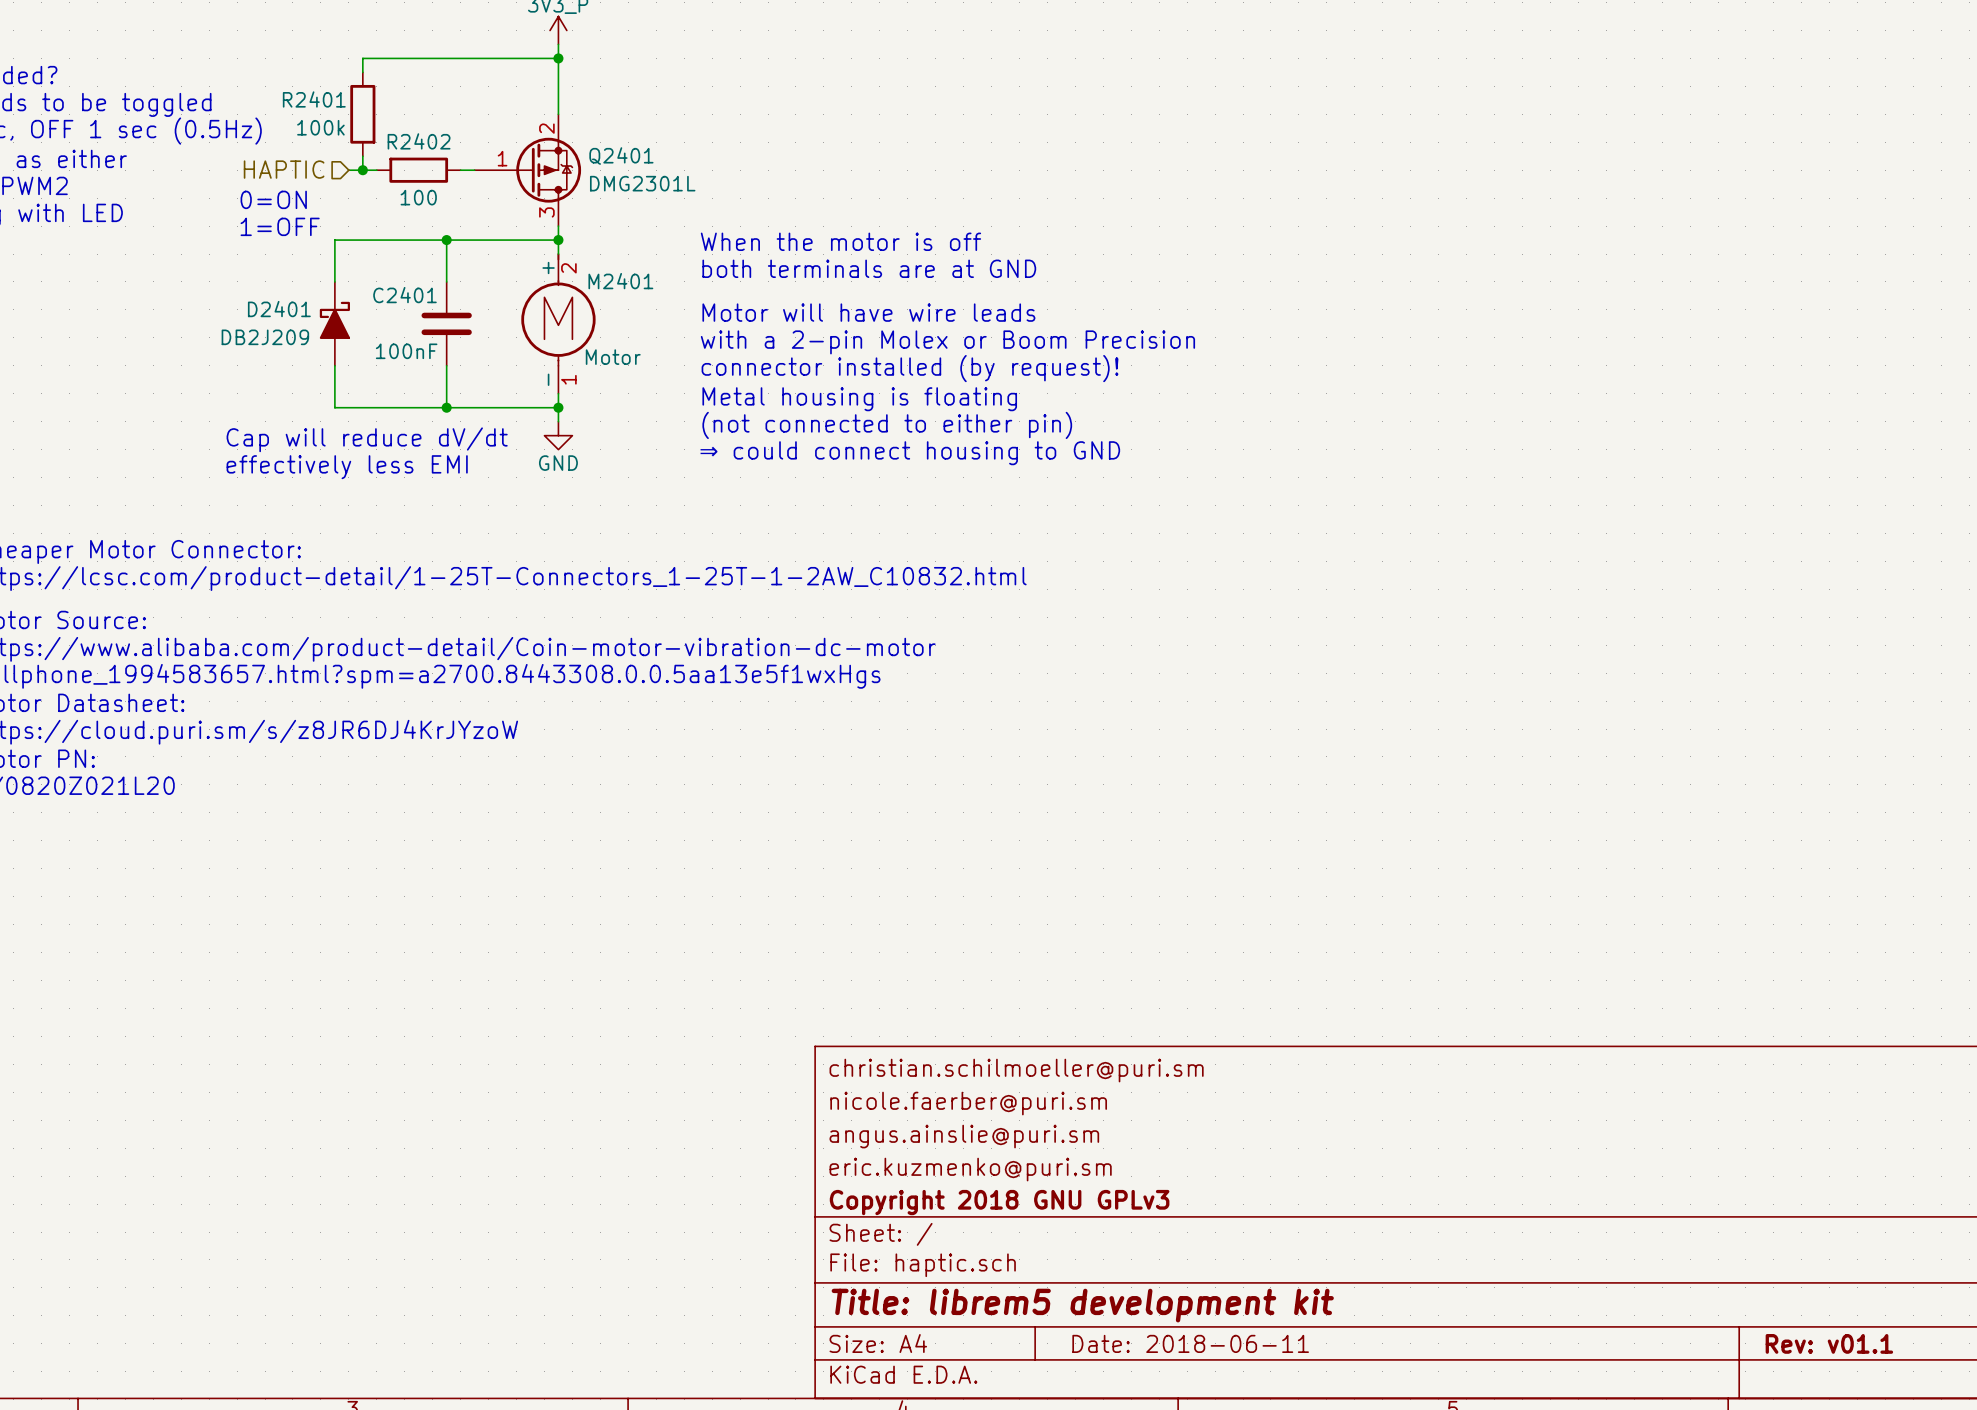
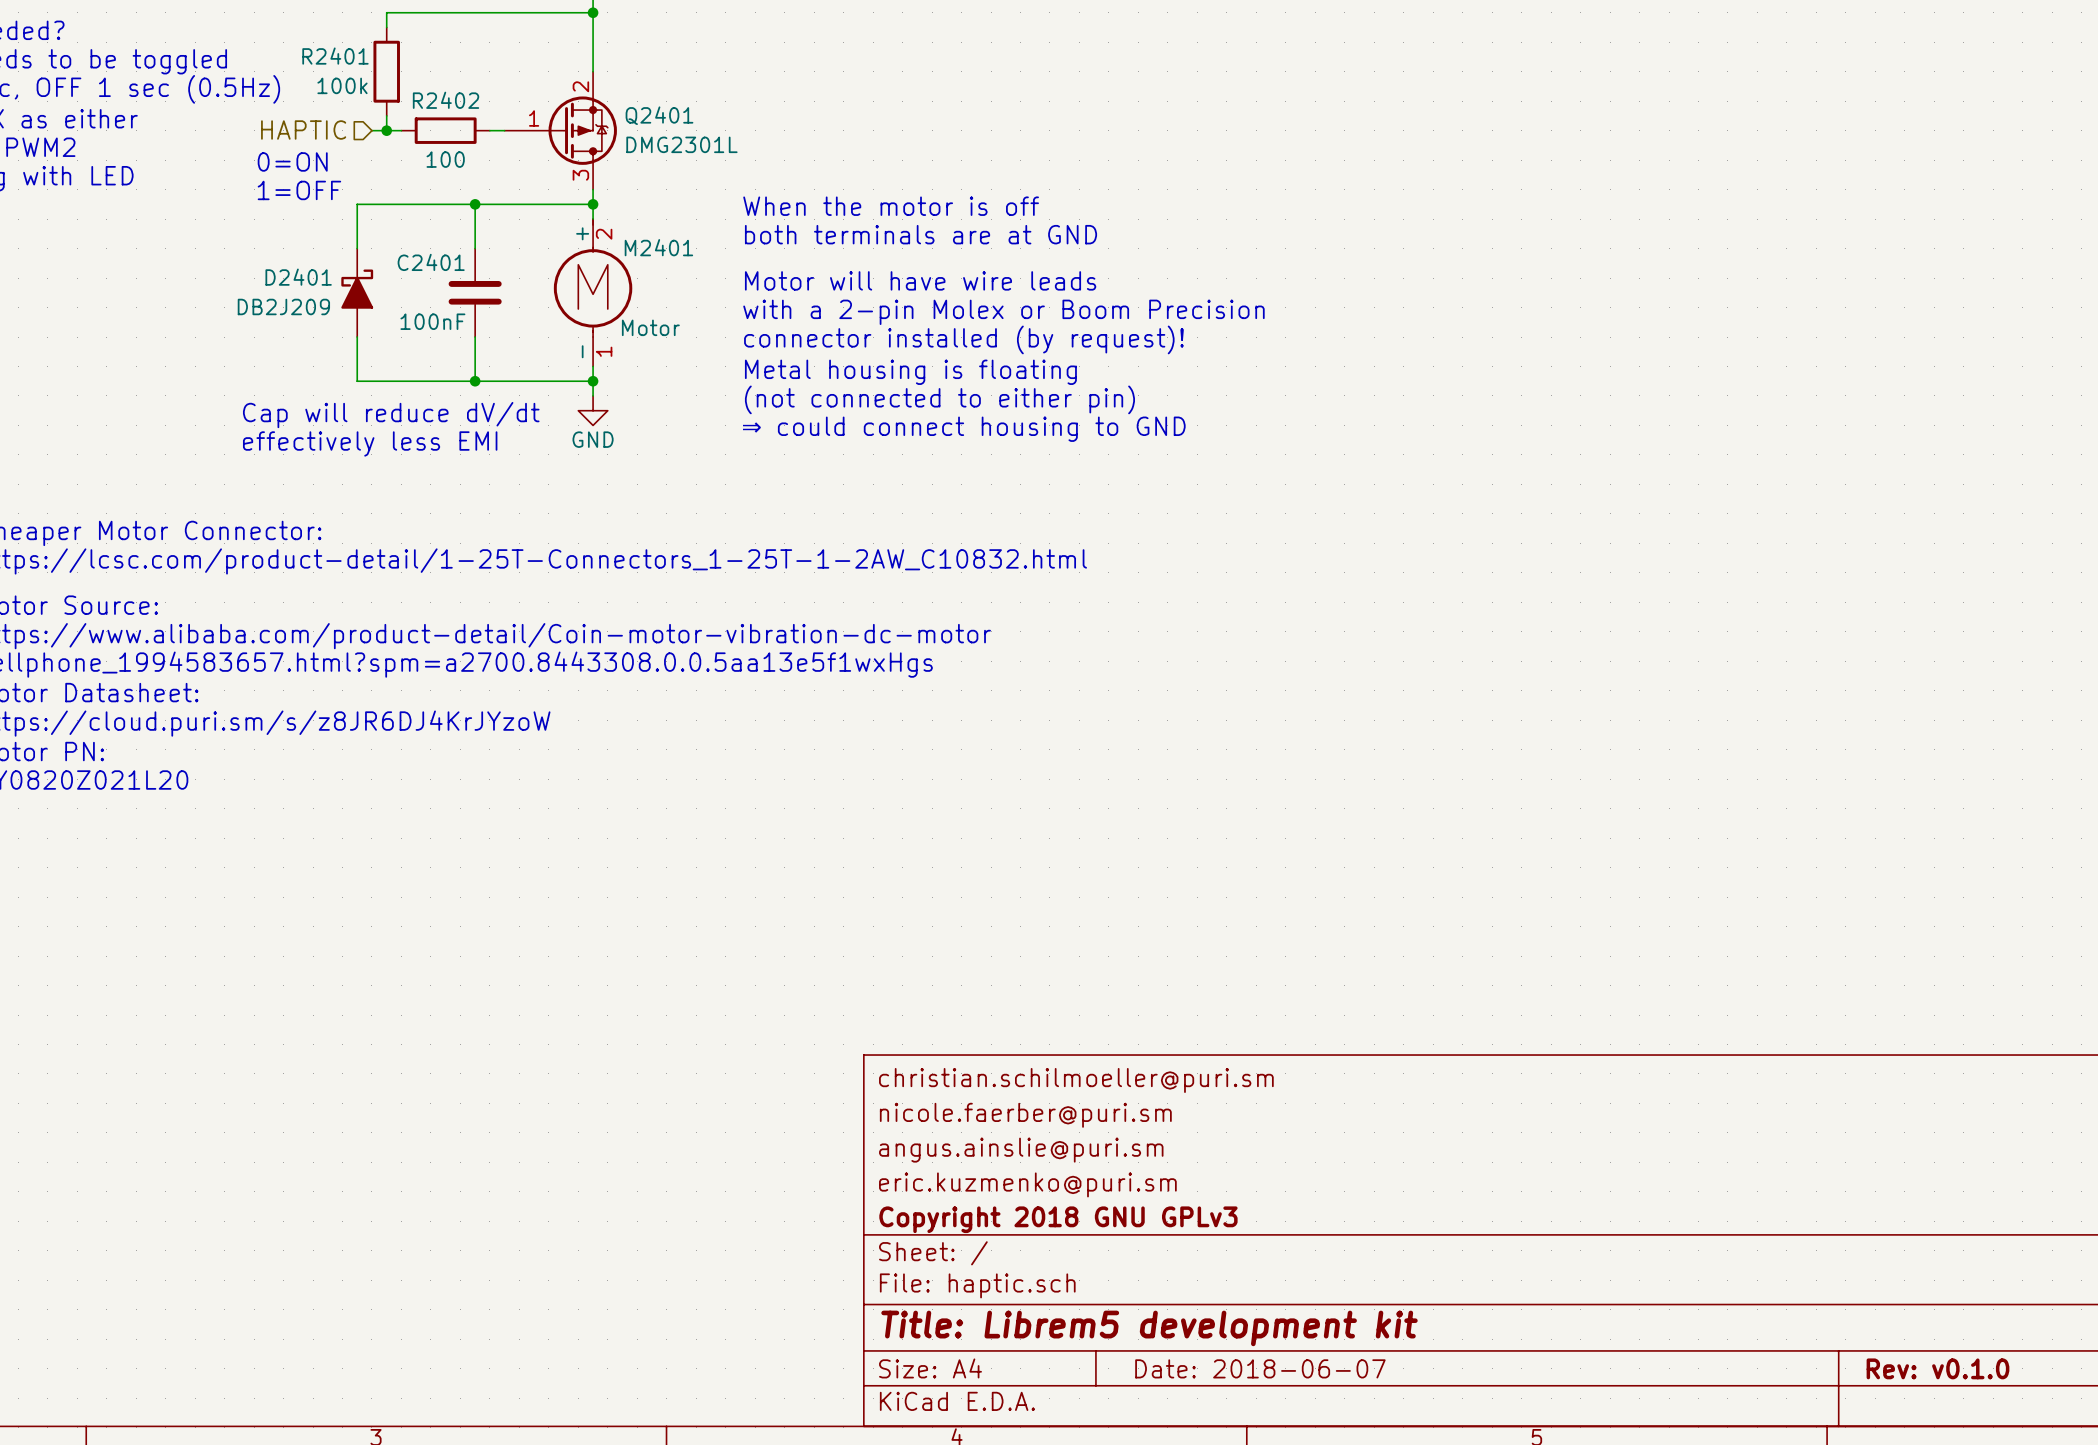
title block: Title: librem5 development kit (1082, 1305) -> Title: Librem5 development kit (1149, 1328)
title block: Date: 2018-06-11 (1190, 1343) -> Date: 2018-06-07 (1260, 1368)
title block: Rev: v01.1 (1829, 1343) -> Rev: v0.1.0 (1937, 1368)

